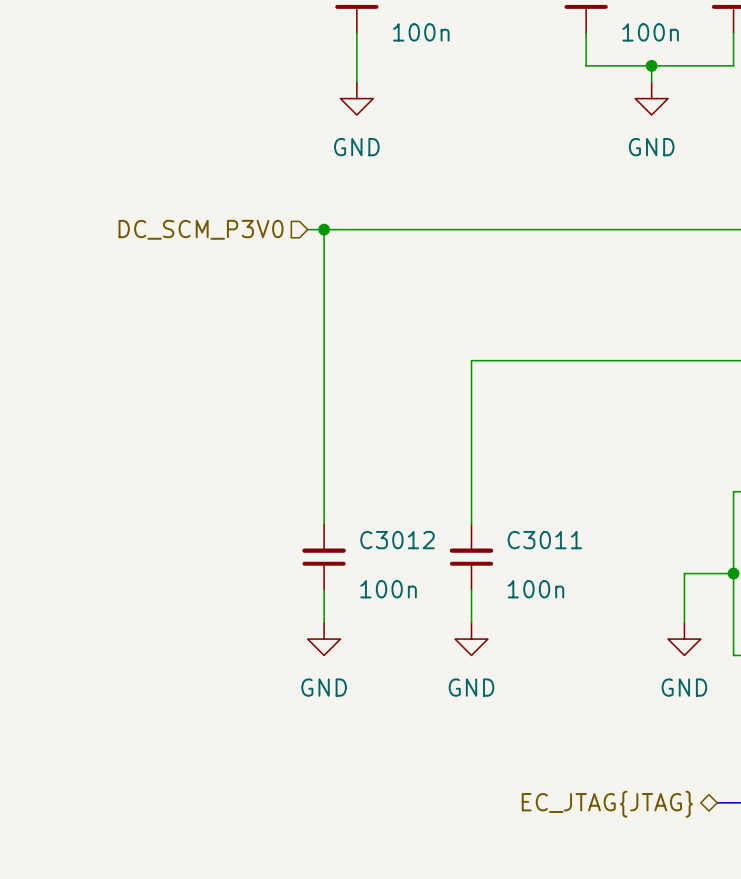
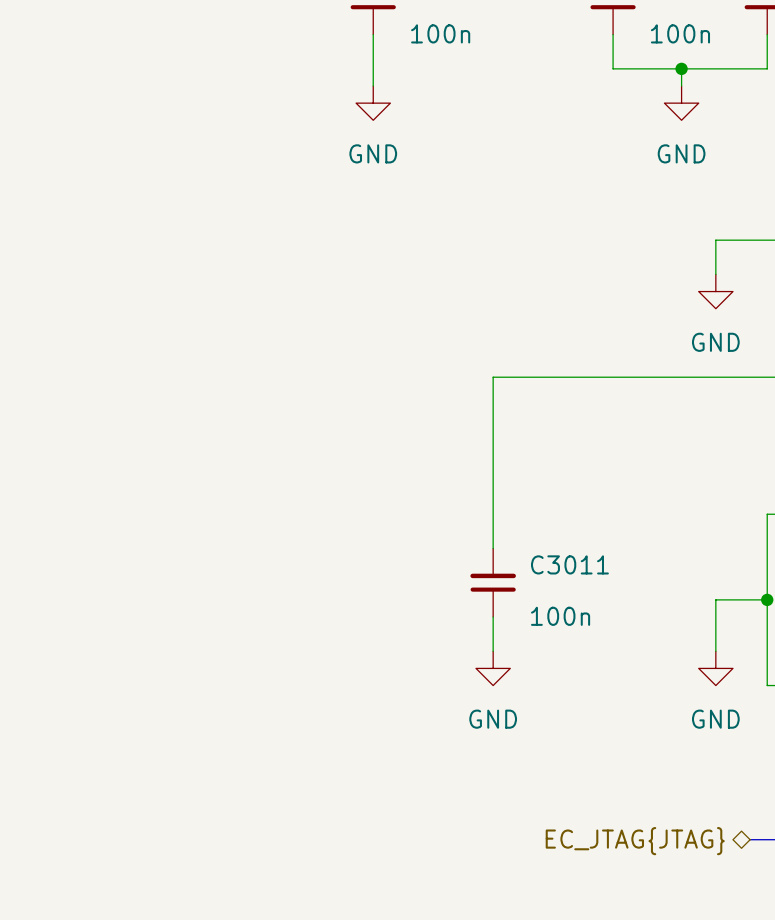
hierarchical label: DC_SCM_P3V0 (201, 229) -> none
wire: (307, 229) (684, 229) -> (715, 274) (715, 240)
wire: (324, 229) (324, 524) -> none
junction: (324, 229) -> none
power symbol: none -> GND (715, 291)
C3012: (324, 557) -> none
wire: (324, 589) (324, 622) -> none
power symbol: GND (324, 639) -> none

